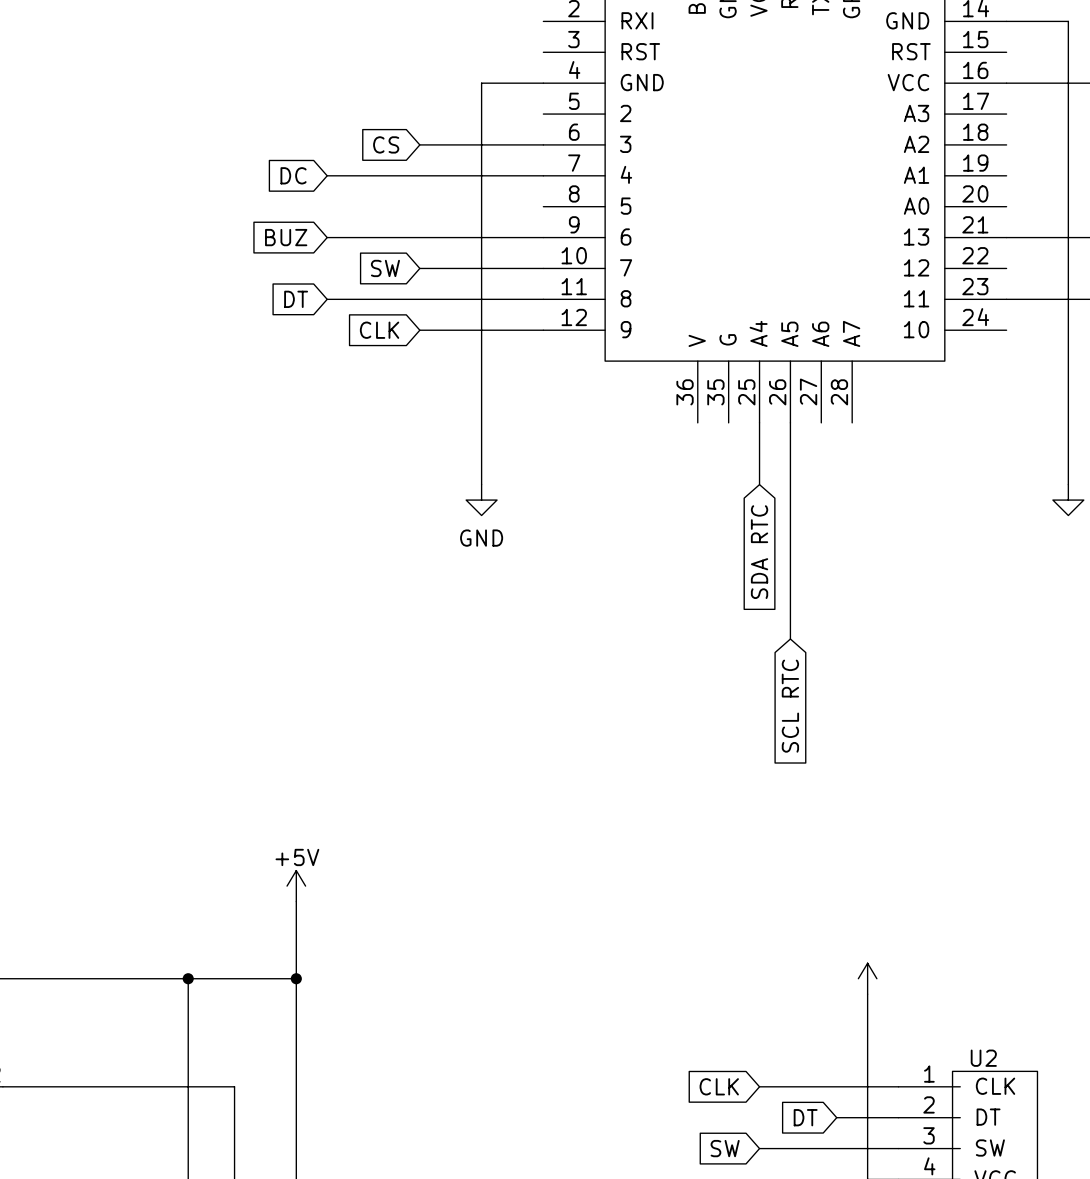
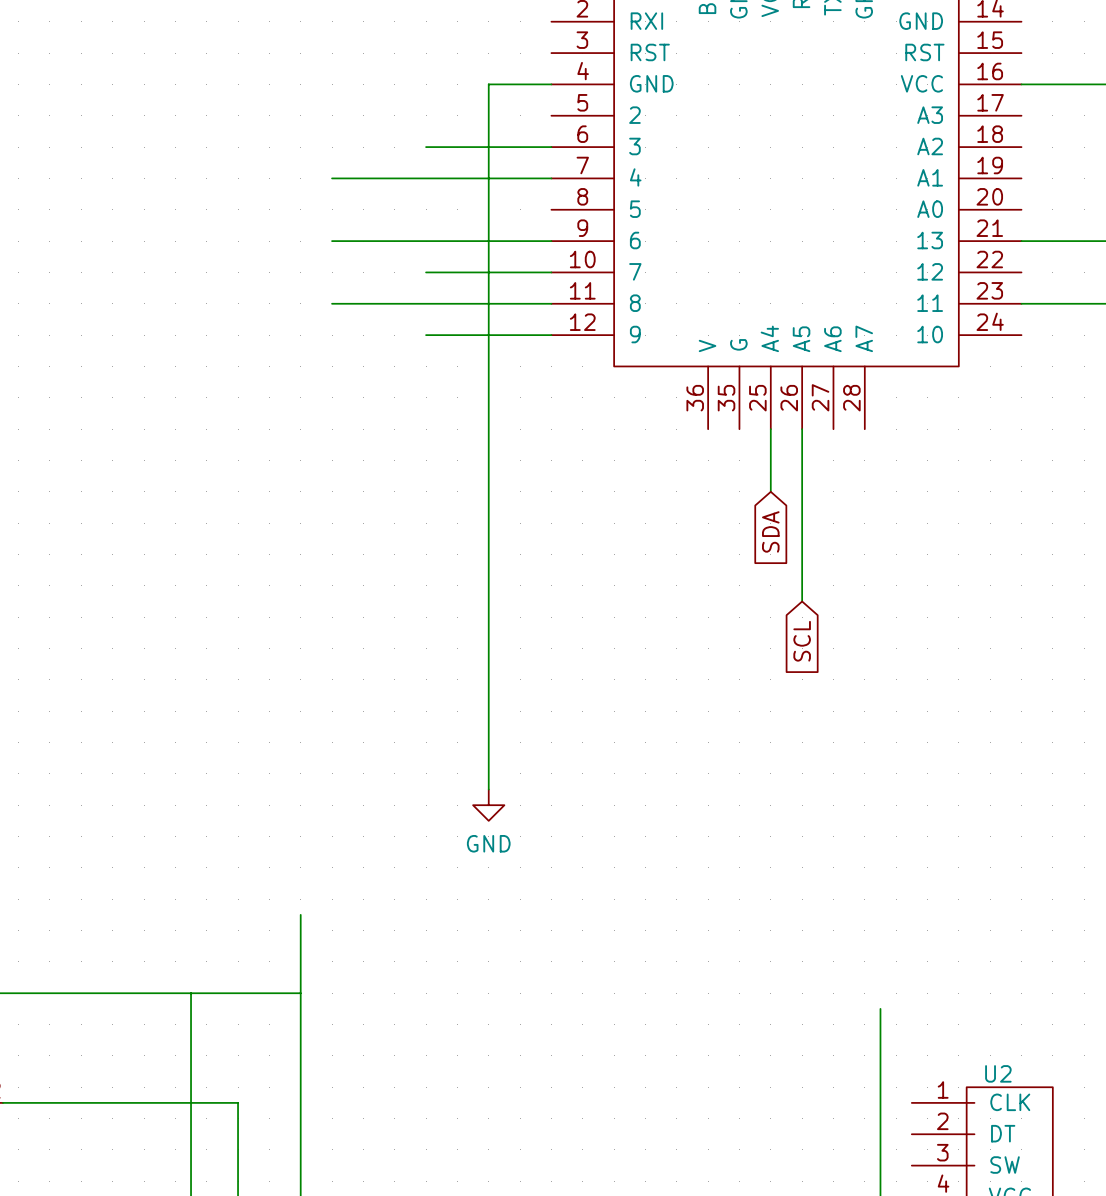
wire: (1006, 21) (1068, 21) (1068, 484) -> none
global label: CS (386, 144) -> none
global label: DC (293, 175) -> none
global label: BUZ (286, 237) -> none
global label: SW (385, 268) -> none
global label: DT (296, 299) -> none
global label: CLK (379, 330) -> none
wire: none -> (488, 491) (488, 789)
power symbol position: GND (481, 500) -> GND (488, 805)
power symbol: (1068, 500) -> none
global label: SDA RTC (759, 552) -> SDA (770, 531)
wire: (790, 592) (790, 639) -> none
global label: none -> SCL (802, 641)
global label: SCL RTC (790, 706) -> none
power symbol: +5V (296, 886) -> none
junction: (188, 978) -> none
junction: (296, 978) -> none
power symbol: (867, 978) -> none
global label: CLK (719, 1086) -> none
wire: (759, 1086) (898, 1086) -> none
global label: DT (805, 1117) -> none
wire: (836, 1117) (898, 1117) -> none
global label: SW (725, 1148) -> none
wire: (759, 1148) (898, 1148) -> none

